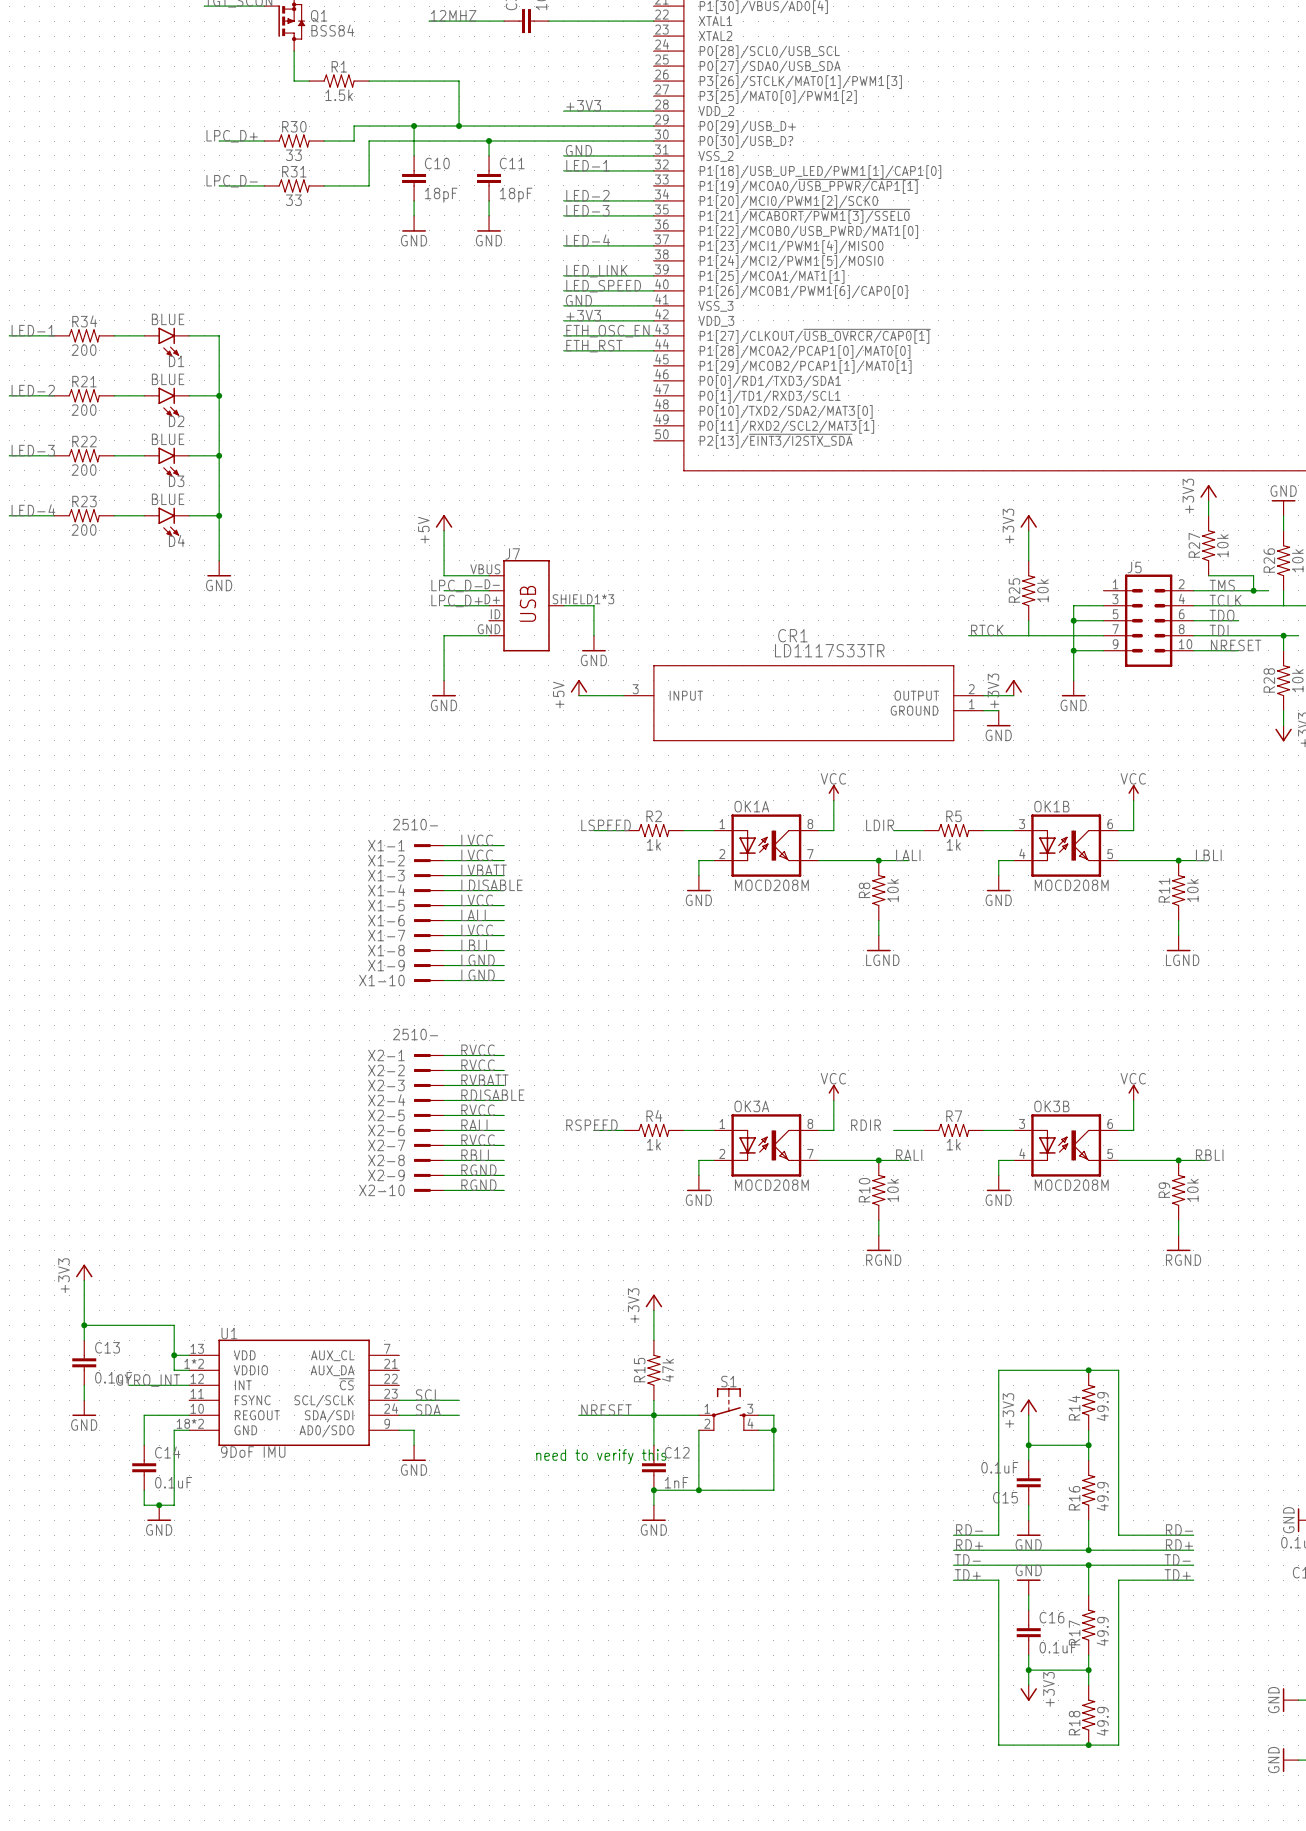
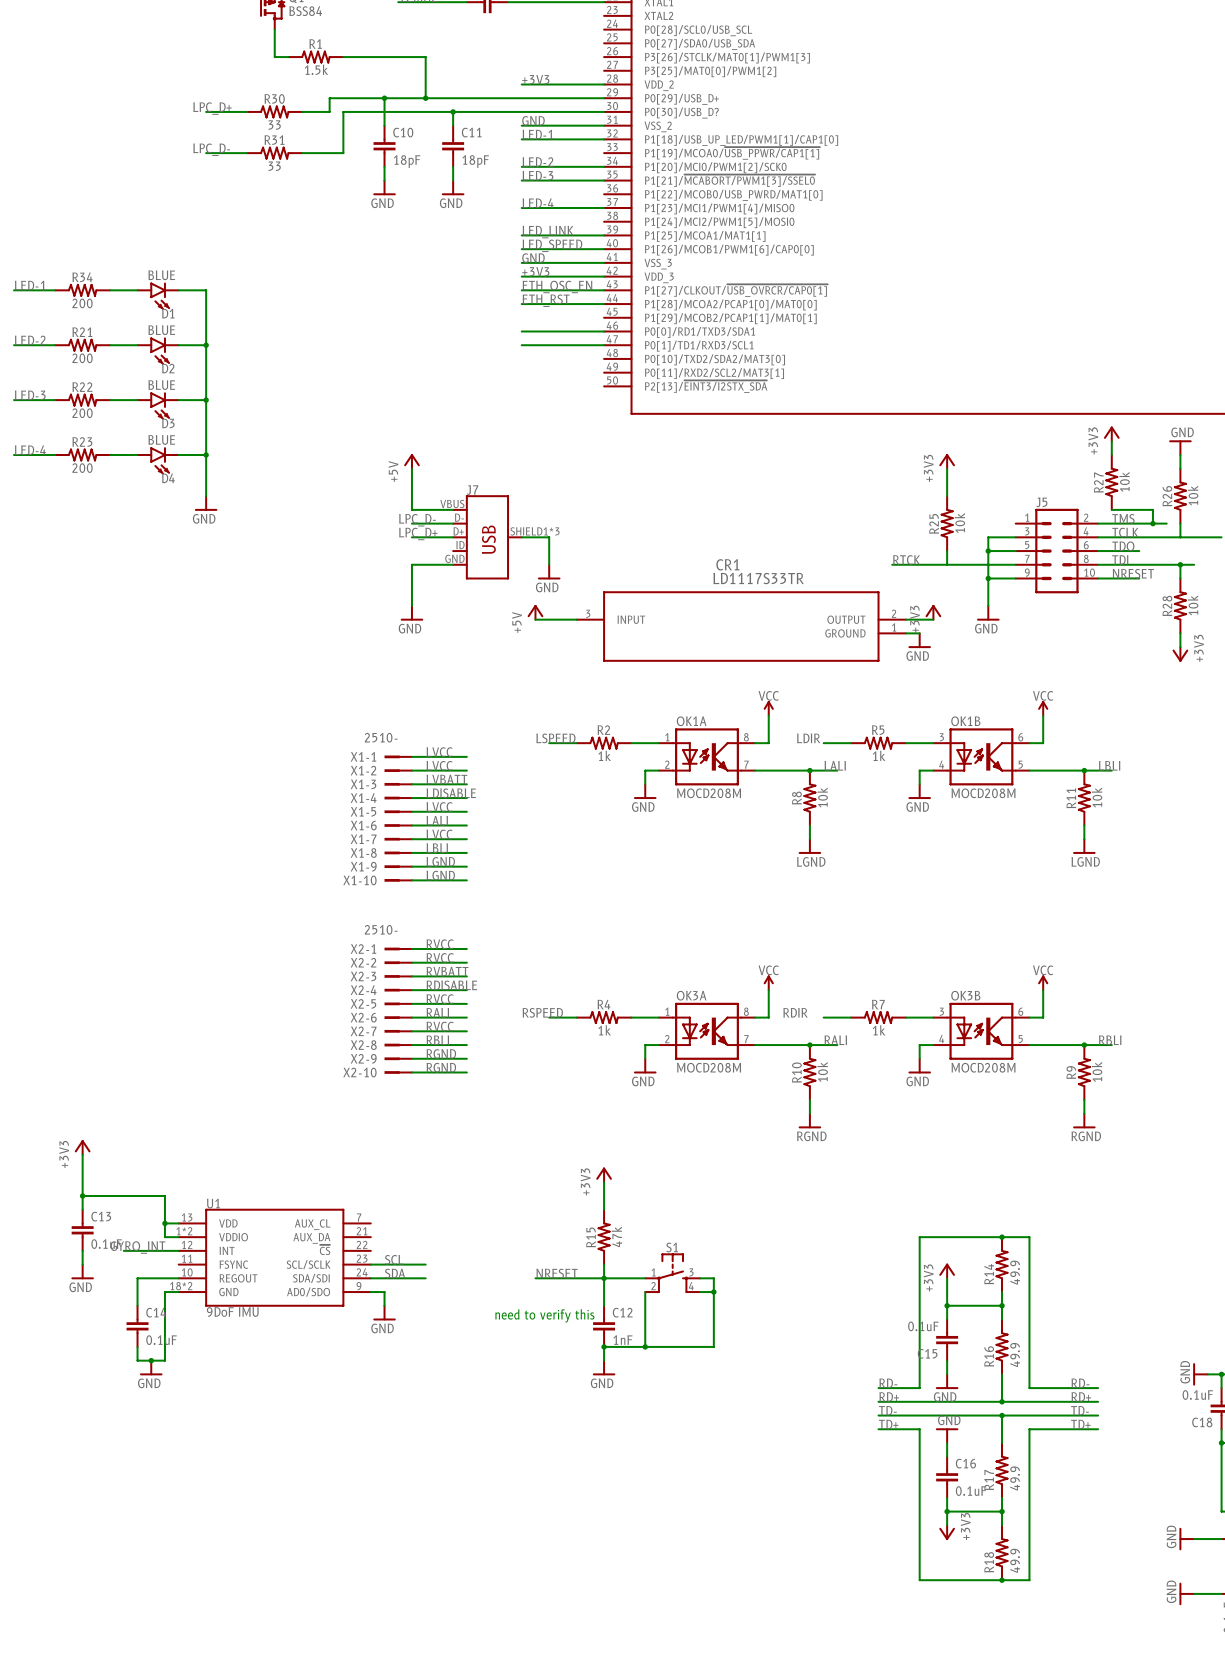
wire: none -> (521, 331) (604, 331)
wire: none -> (521, 345) (604, 345)

